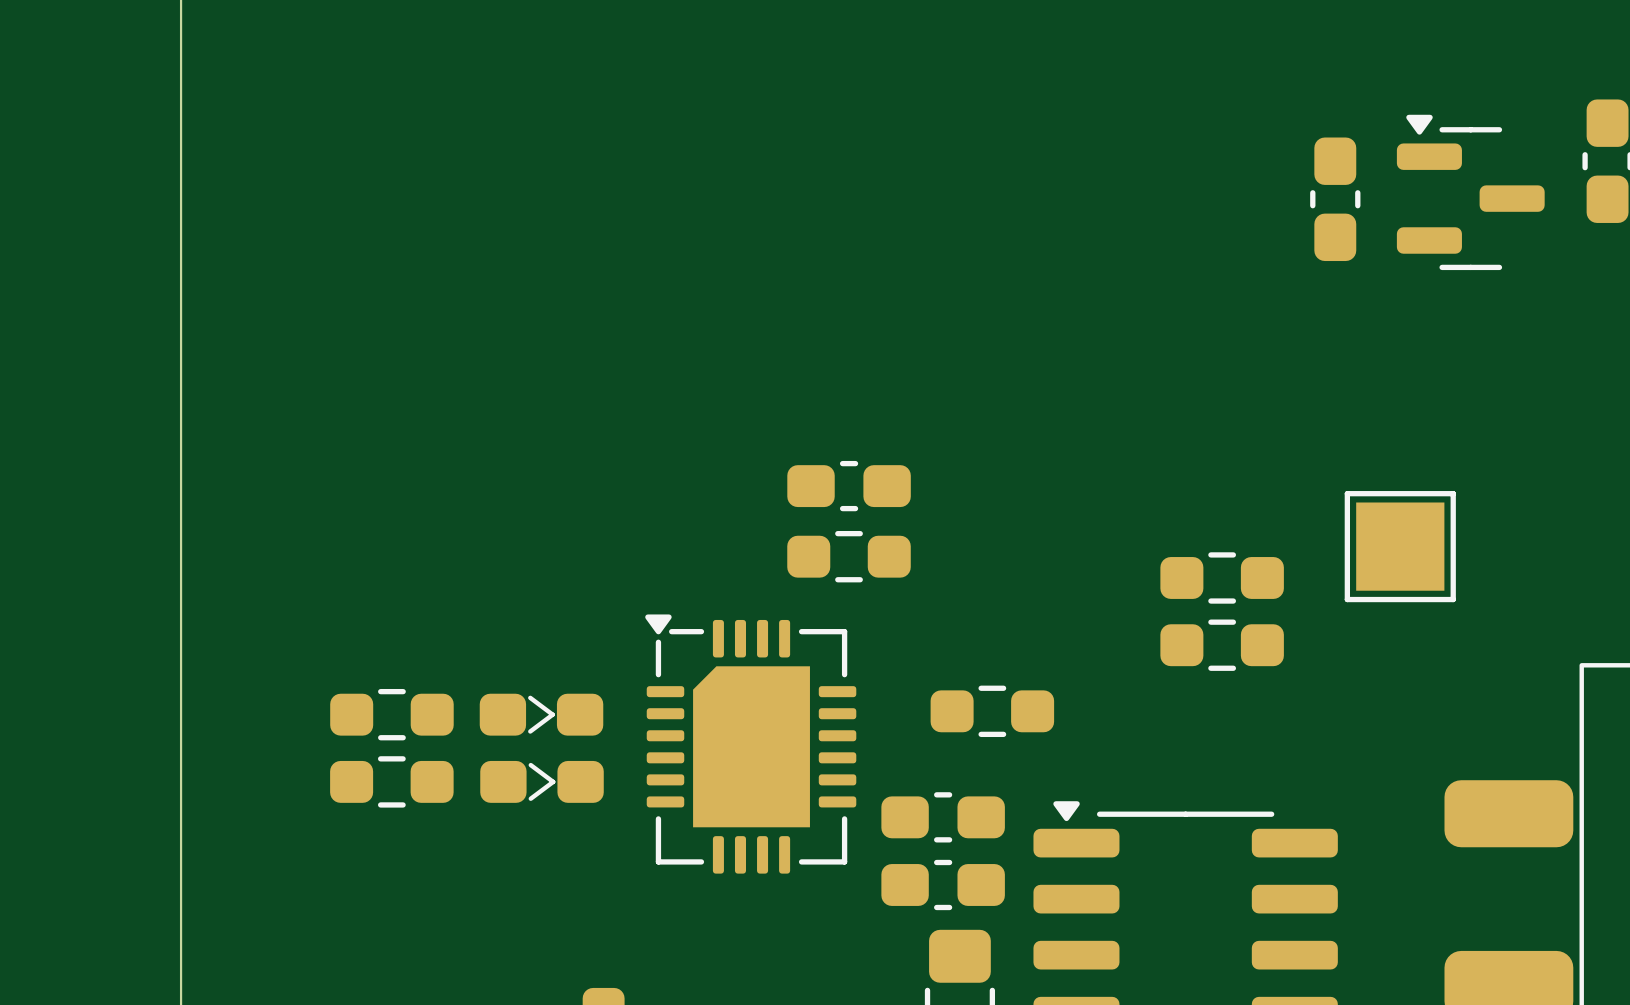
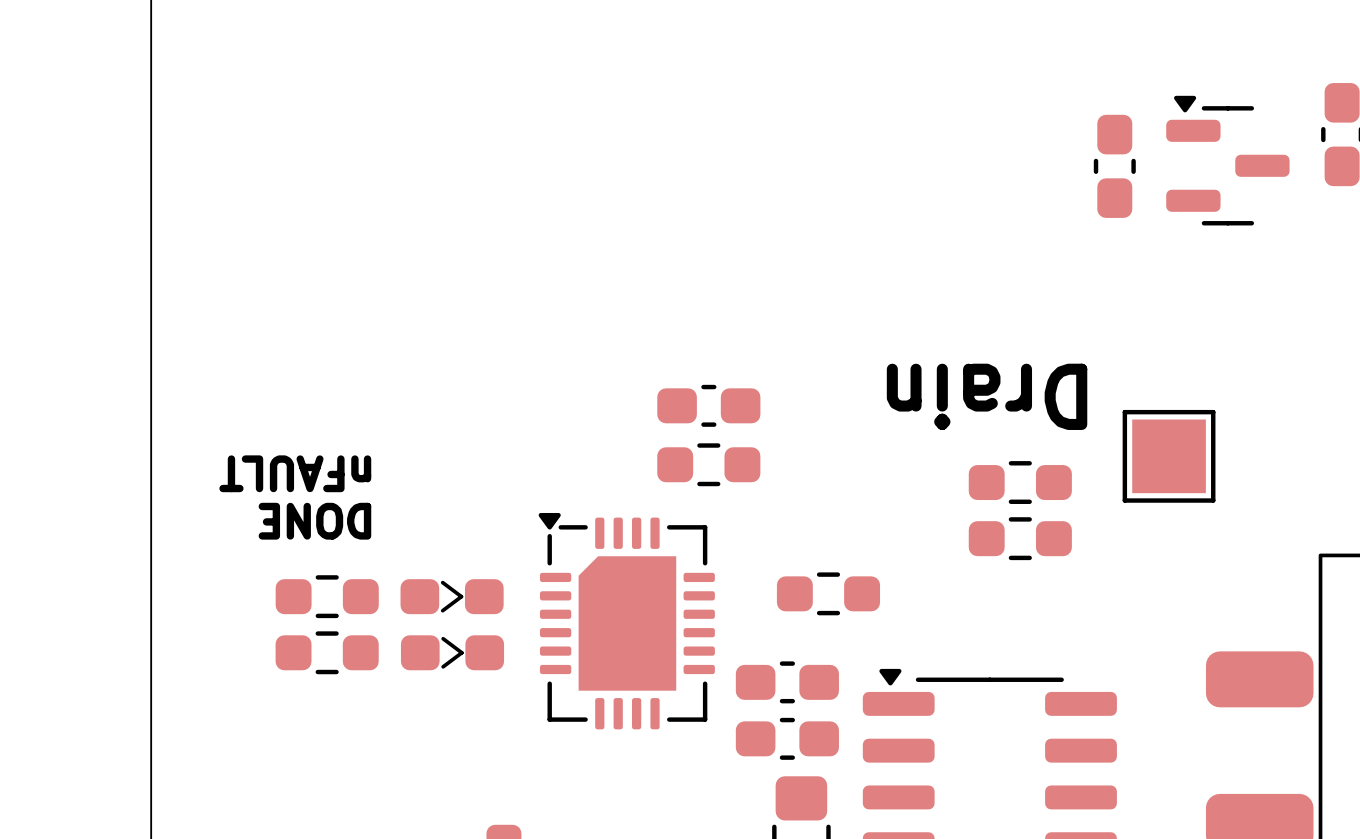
text: none -> Drain (987, 396)
text: none -> nFAULT (295, 473)
text: none -> DONE (314, 521)

